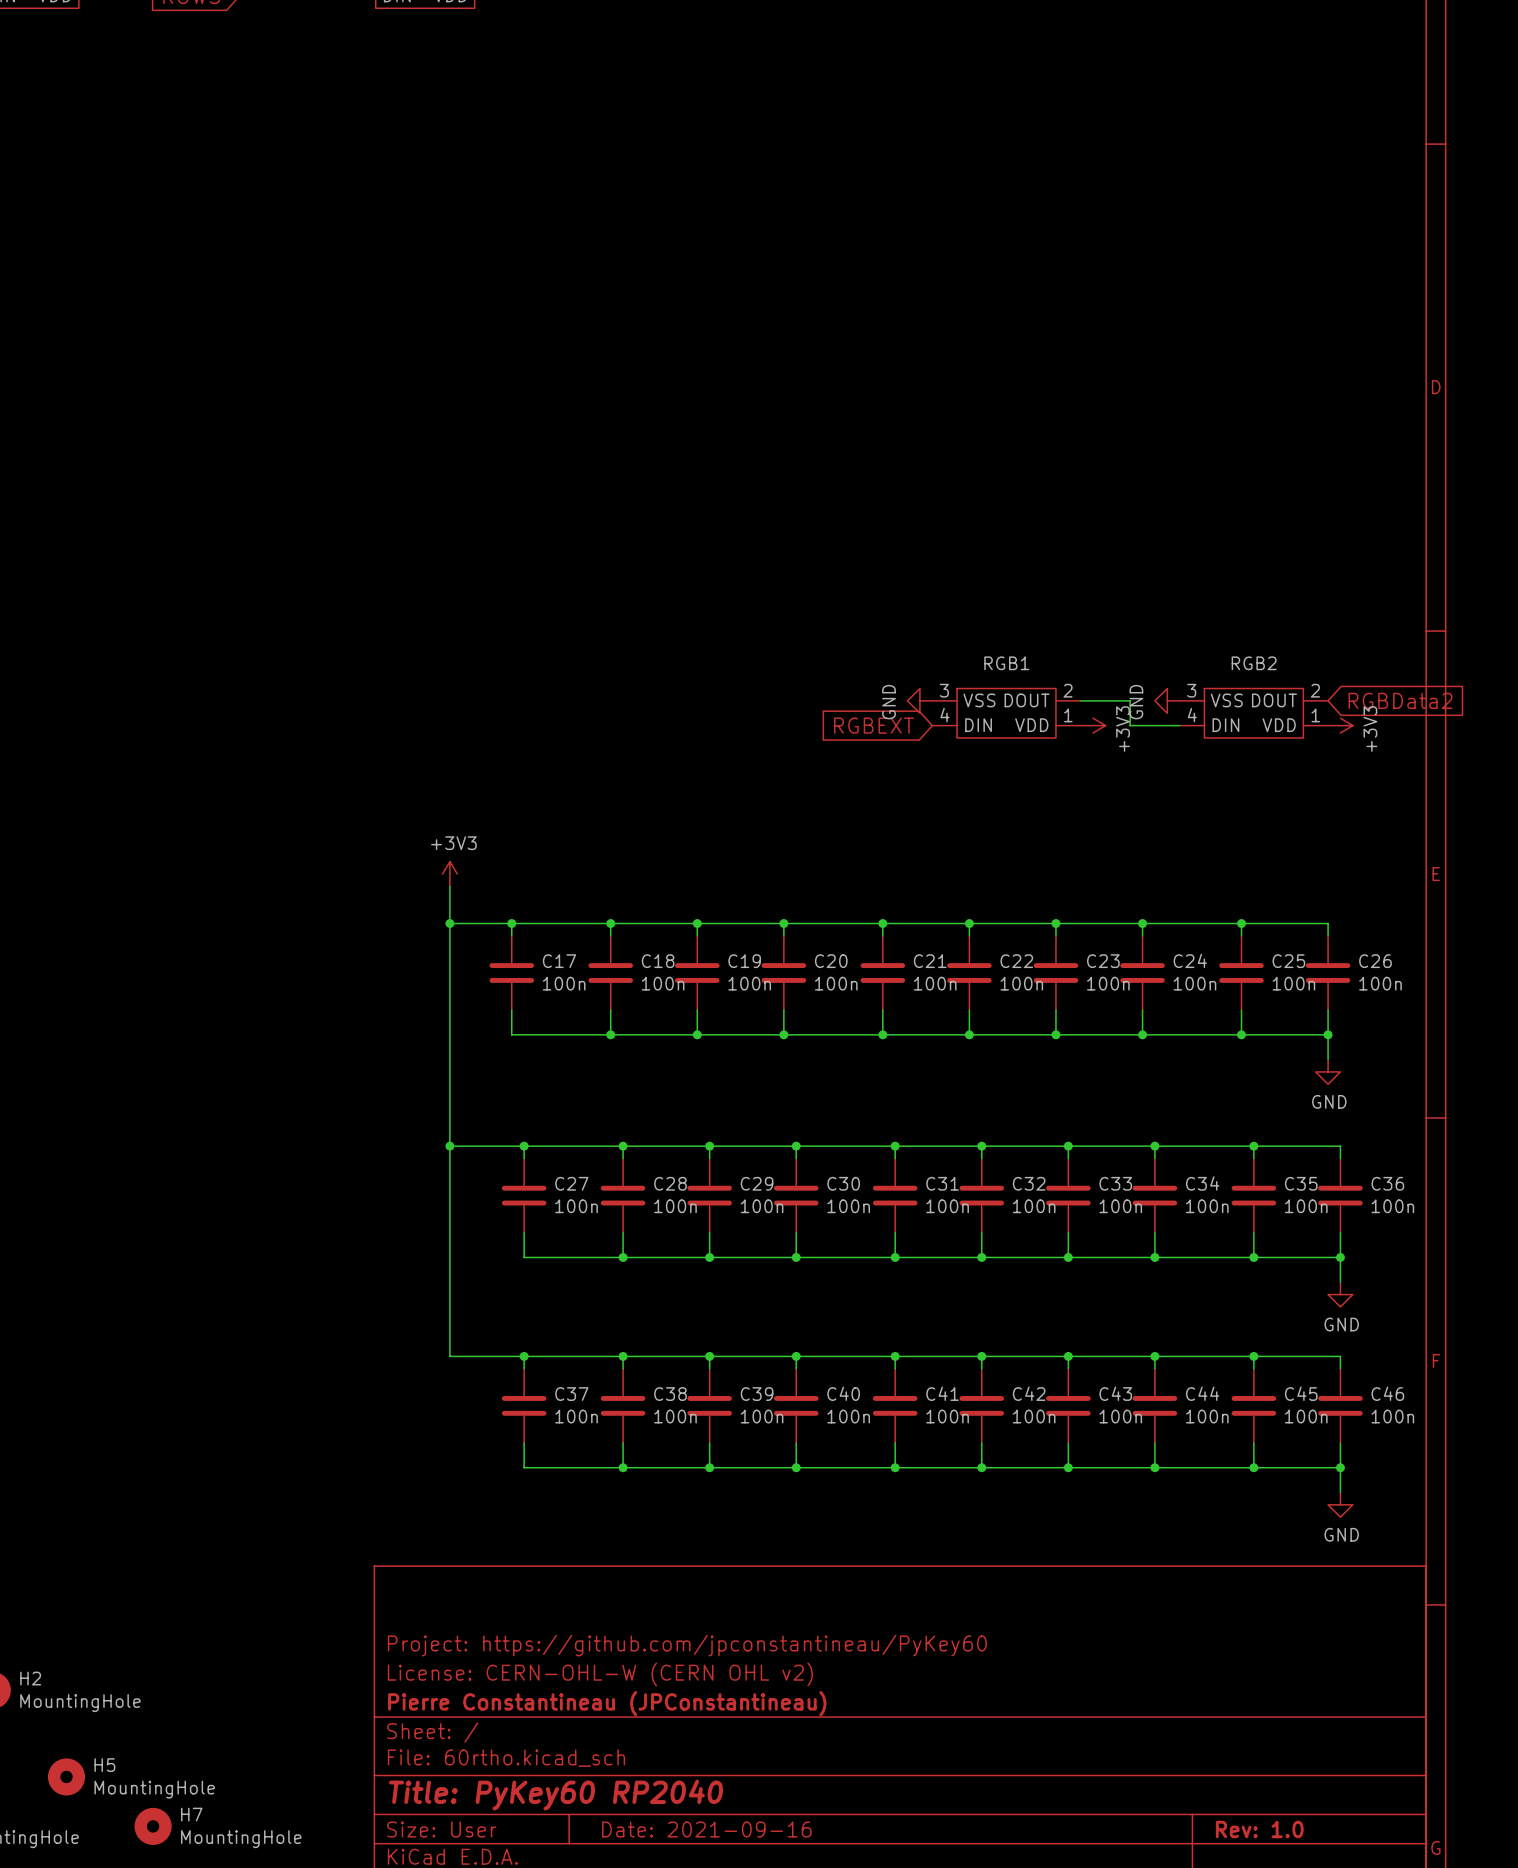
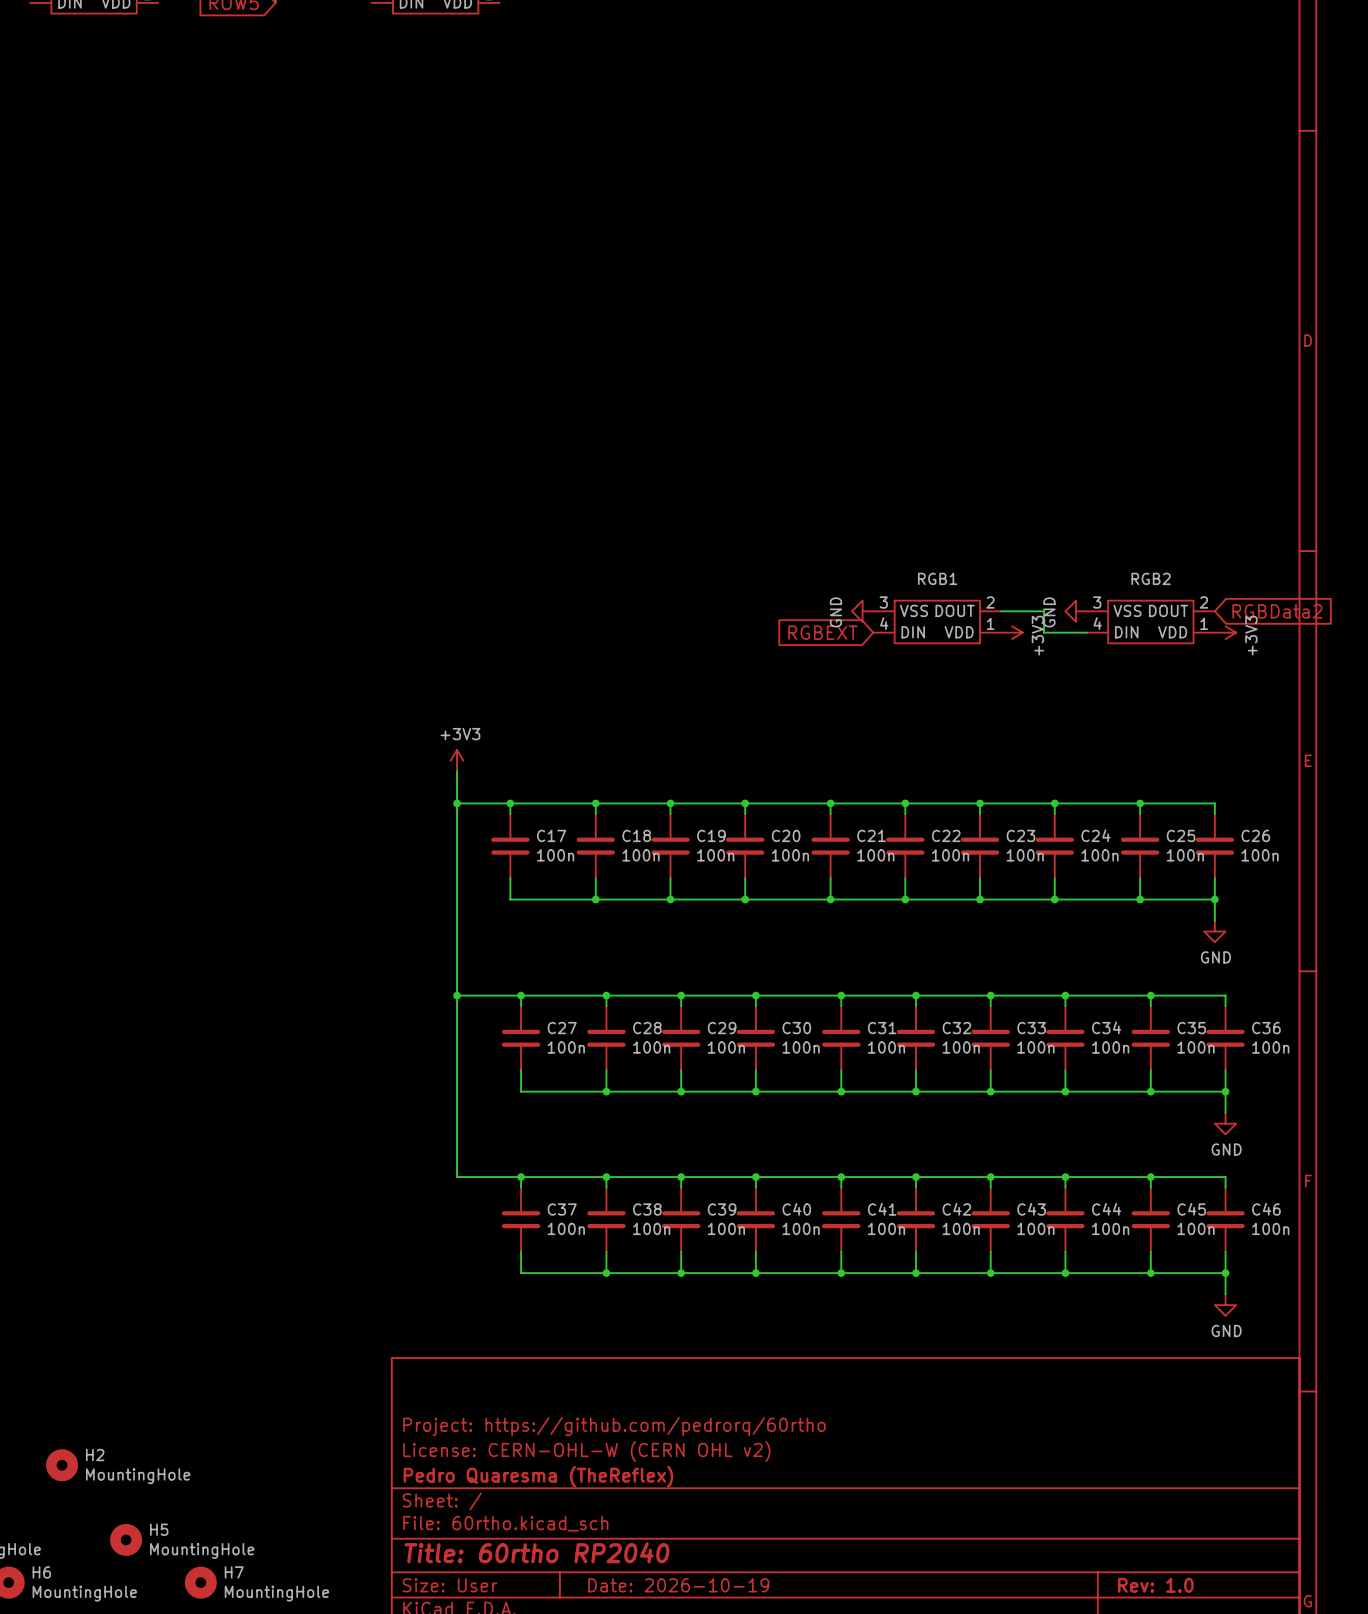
title block: Project: https://github.com/jpconstantineau/PyKey60 (687, 1645) -> Project: https://github.com/pedrorq/60rtho (614, 1426)
title block: Pierre Constantineau (JPConstantineau) (607, 1703) -> Pedro Quaresma (TheReflex) (538, 1476)
title block: Title: PyKey60 RP2040 (556, 1795) -> Title: 60rtho RP2040 (537, 1552)
title block: Date: 2021-09-16 (706, 1829) -> Date: 2026-10-19 (678, 1585)

